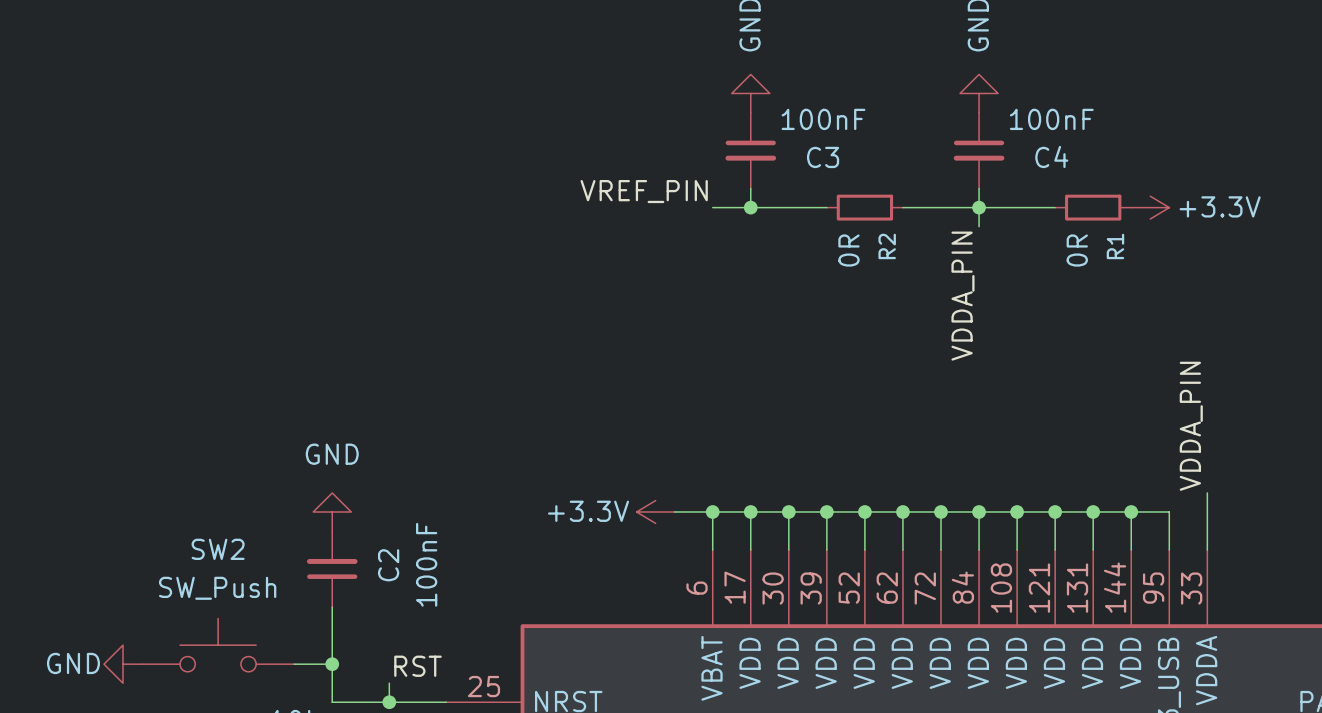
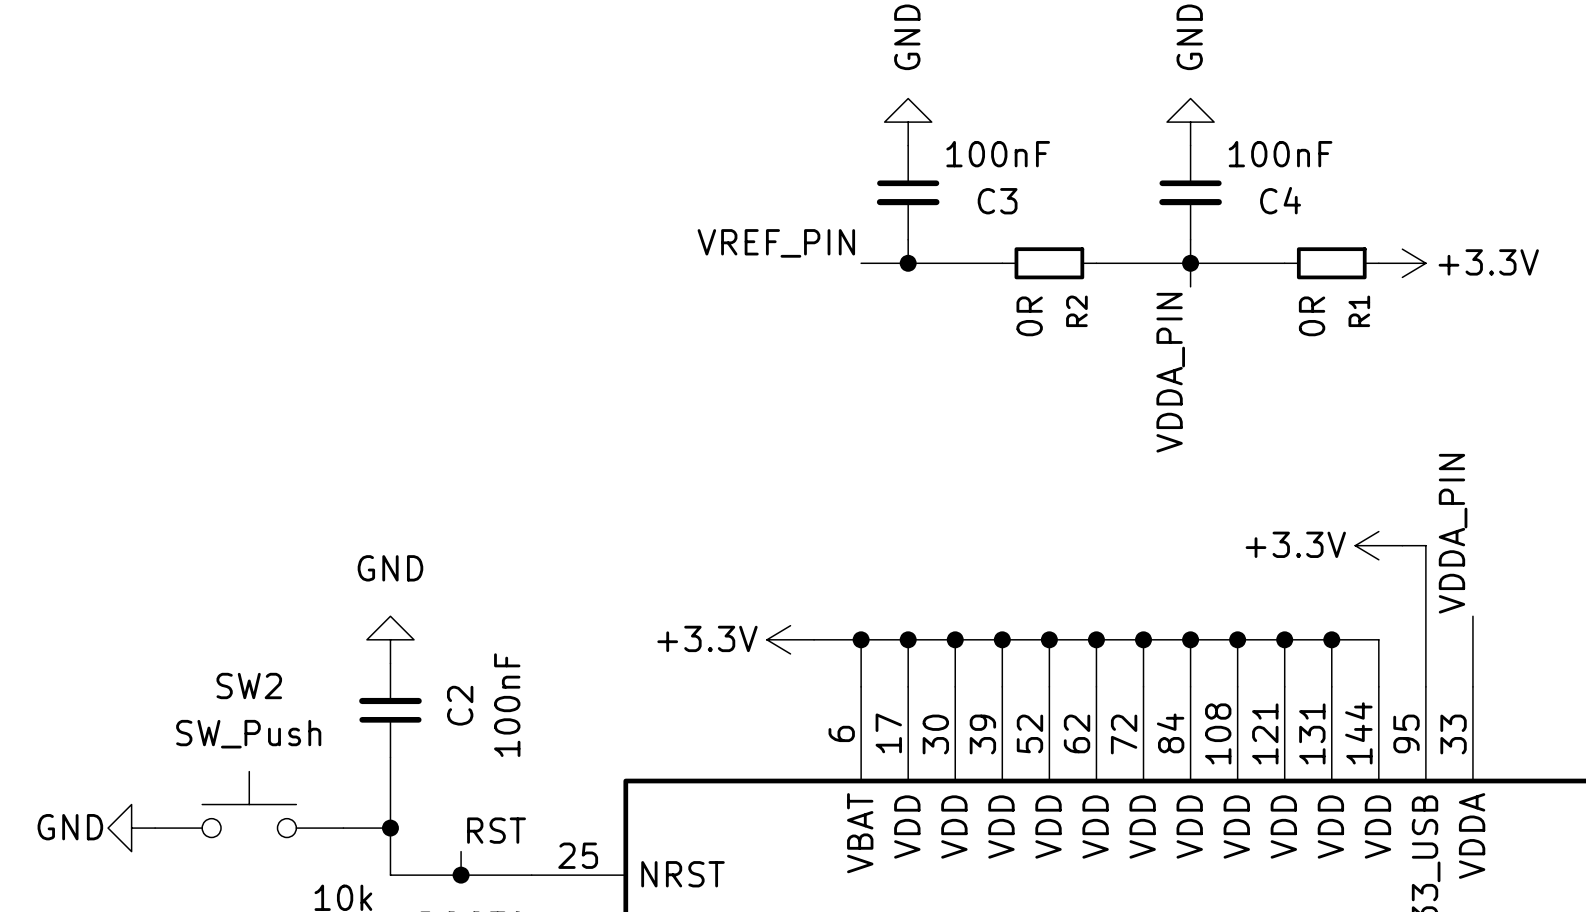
power symbol: none -> +3.3V (1378, 545)
wire: (1131, 511) (1169, 511) -> (1402, 545) (1425, 545) (1425, 639)
junction: (1131, 511) -> none

